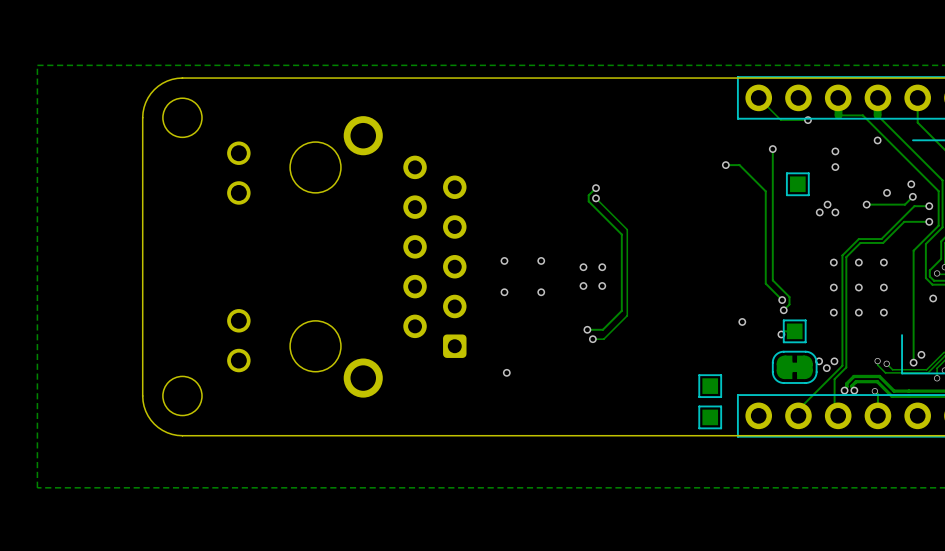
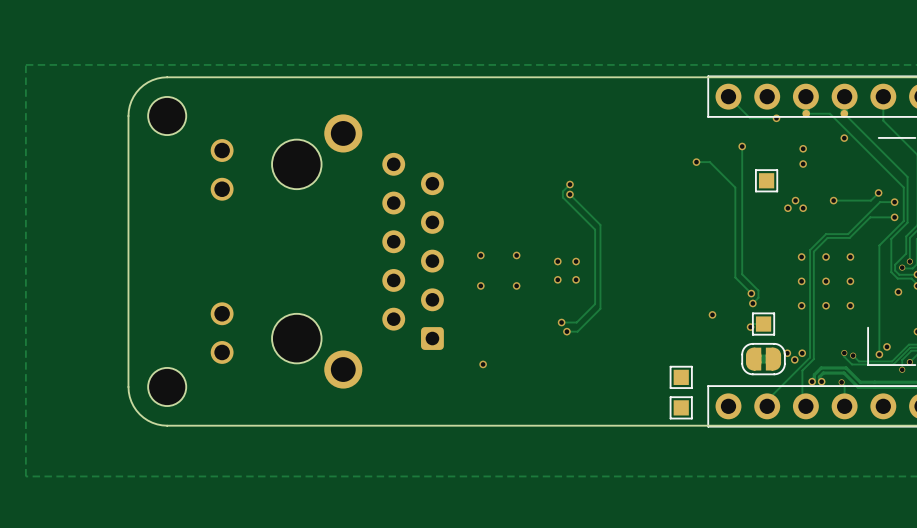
via: (911, 184) -> none
via: (887, 192) -> none

